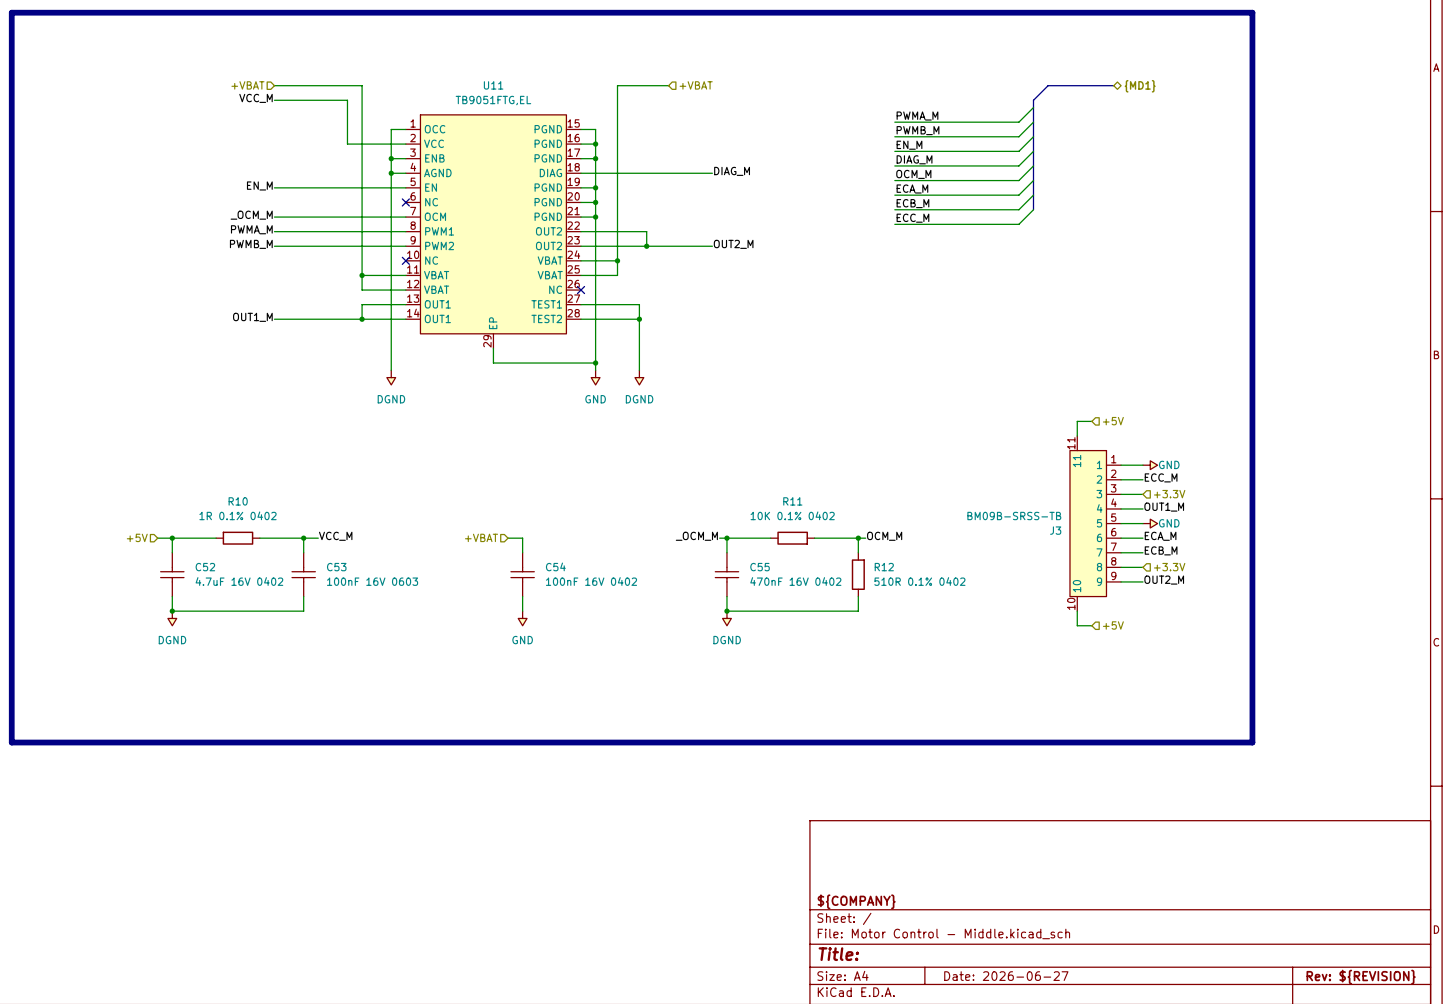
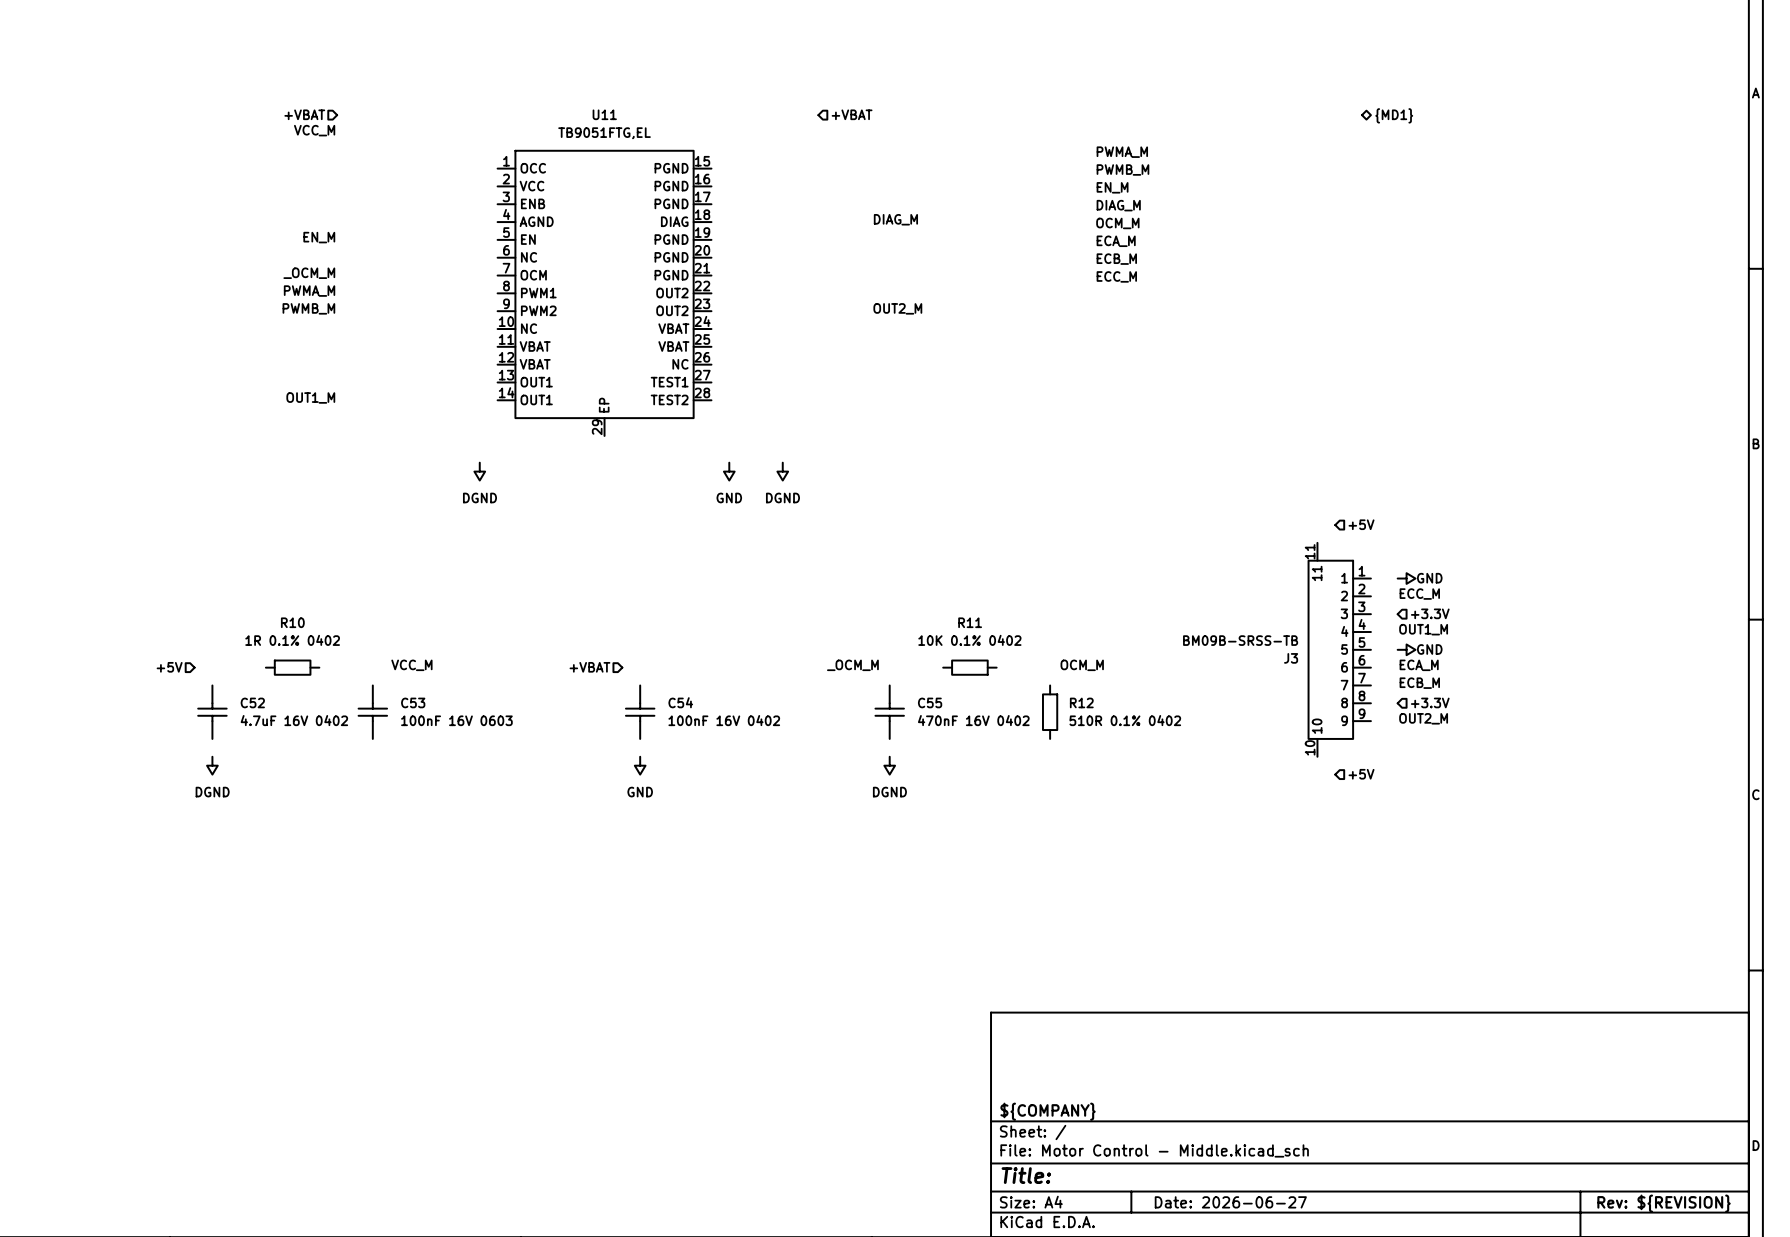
line: (11, 12) (1252, 12) (1252, 742) (11, 742) (11, 12) -> none
wire: (274, 85) (362, 85) (362, 290) (405, 290) -> none
wire: (668, 85) (617, 85) (617, 275) (581, 275) -> none
bus: (1113, 85) (1048, 85) (1033, 100) (1033, 209) -> none
wire: (274, 100) (347, 100) (347, 144) (405, 144) -> none
wire: (1033, 107) (1018, 122) (894, 122) -> none
wire: (1033, 122) (1018, 136) (894, 136) -> none
wire: (405, 129) (391, 129) (391, 370) -> none
wire: (581, 129) (595, 129) (595, 370) -> none
wire: (1033, 136) (1018, 151) (894, 151) -> none
wire: (581, 144) (595, 144) -> none
junction: (595, 144) -> none
wire: (1033, 151) (1018, 165) (894, 165) -> none
wire: (391, 158) (405, 158) -> none
junction: (391, 158) -> none
wire: (581, 158) (595, 158) -> none
junction: (595, 158) -> none
wire: (1033, 165) (1018, 180) (894, 180) -> none
wire: (391, 173) (405, 173) -> none
junction: (391, 173) -> none
wire: (581, 173) (712, 173) -> none
wire: (1033, 180) (1018, 195) (894, 195) -> none
wire: (274, 187) (405, 187) -> none
wire: (581, 187) (595, 187) -> none
junction: (595, 187) -> none
wire: (1033, 195) (1018, 209) (894, 209) -> none
no-connect mark: (405, 202) -> none
wire: (581, 202) (595, 202) -> none
junction: (595, 202) -> none
wire: (1033, 209) (1018, 224) (894, 224) -> none
wire: (274, 217) (405, 217) -> none
wire: (581, 217) (595, 217) -> none
junction: (595, 217) -> none
wire: (274, 231) (405, 231) -> none
wire: (581, 231) (646, 231) (646, 246) -> none
wire: (274, 246) (405, 246) -> none
wire: (581, 246) (712, 246) -> none
junction: (646, 246) -> none
no-connect mark: (405, 260) -> none
wire: (581, 260) (617, 260) -> none
junction: (617, 260) -> none
wire: (362, 275) (405, 275) -> none
junction: (362, 275) -> none
no-connect mark: (581, 290) -> none
wire: (405, 304) (362, 304) (362, 319) -> none
wire: (581, 304) (639, 304) (639, 370) -> none
wire: (274, 319) (405, 319) -> none
junction: (362, 319) -> none
wire: (581, 319) (639, 319) -> none
junction: (639, 319) -> none
wire: (493, 348) (493, 363) (595, 363) -> none
junction: (595, 363) -> none
wire: (1091, 421) (1077, 421) (1077, 436) -> none
wire: (1121, 465) (1142, 465) -> none
wire: (1121, 479) (1142, 479) -> none
wire: (1121, 494) (1142, 494) -> none
wire: (1121, 508) (1142, 508) -> none
wire: (1121, 523) (1142, 523) -> none
wire: (157, 538) (216, 538) -> none
wire: (172, 538) (172, 552) -> none
junction: (172, 538) -> none
wire: (259, 538) (318, 538) -> none
wire: (303, 538) (303, 552) -> none
junction: (303, 538) -> none
wire: (508, 538) (522, 538) (522, 552) -> none
wire: (719, 538) (770, 538) -> none
wire: (726, 538) (726, 552) -> none
junction: (726, 538) -> none
wire: (814, 538) (865, 538) -> none
wire: (858, 538) (858, 552) -> none
junction: (858, 538) -> none
wire: (1121, 538) (1142, 538) -> none
wire: (1121, 552) (1142, 552) -> none
wire: (1121, 567) (1142, 567) -> none
wire: (1121, 581) (1142, 581) -> none
wire: (172, 596) (172, 611) (303, 611) (303, 596) -> none
wire: (522, 596) (522, 611) -> none
wire: (726, 596) (726, 611) (858, 611) (858, 596) -> none
junction: (172, 611) -> none
junction: (726, 611) -> none
wire: (1077, 611) (1077, 625) (1091, 625) -> none

